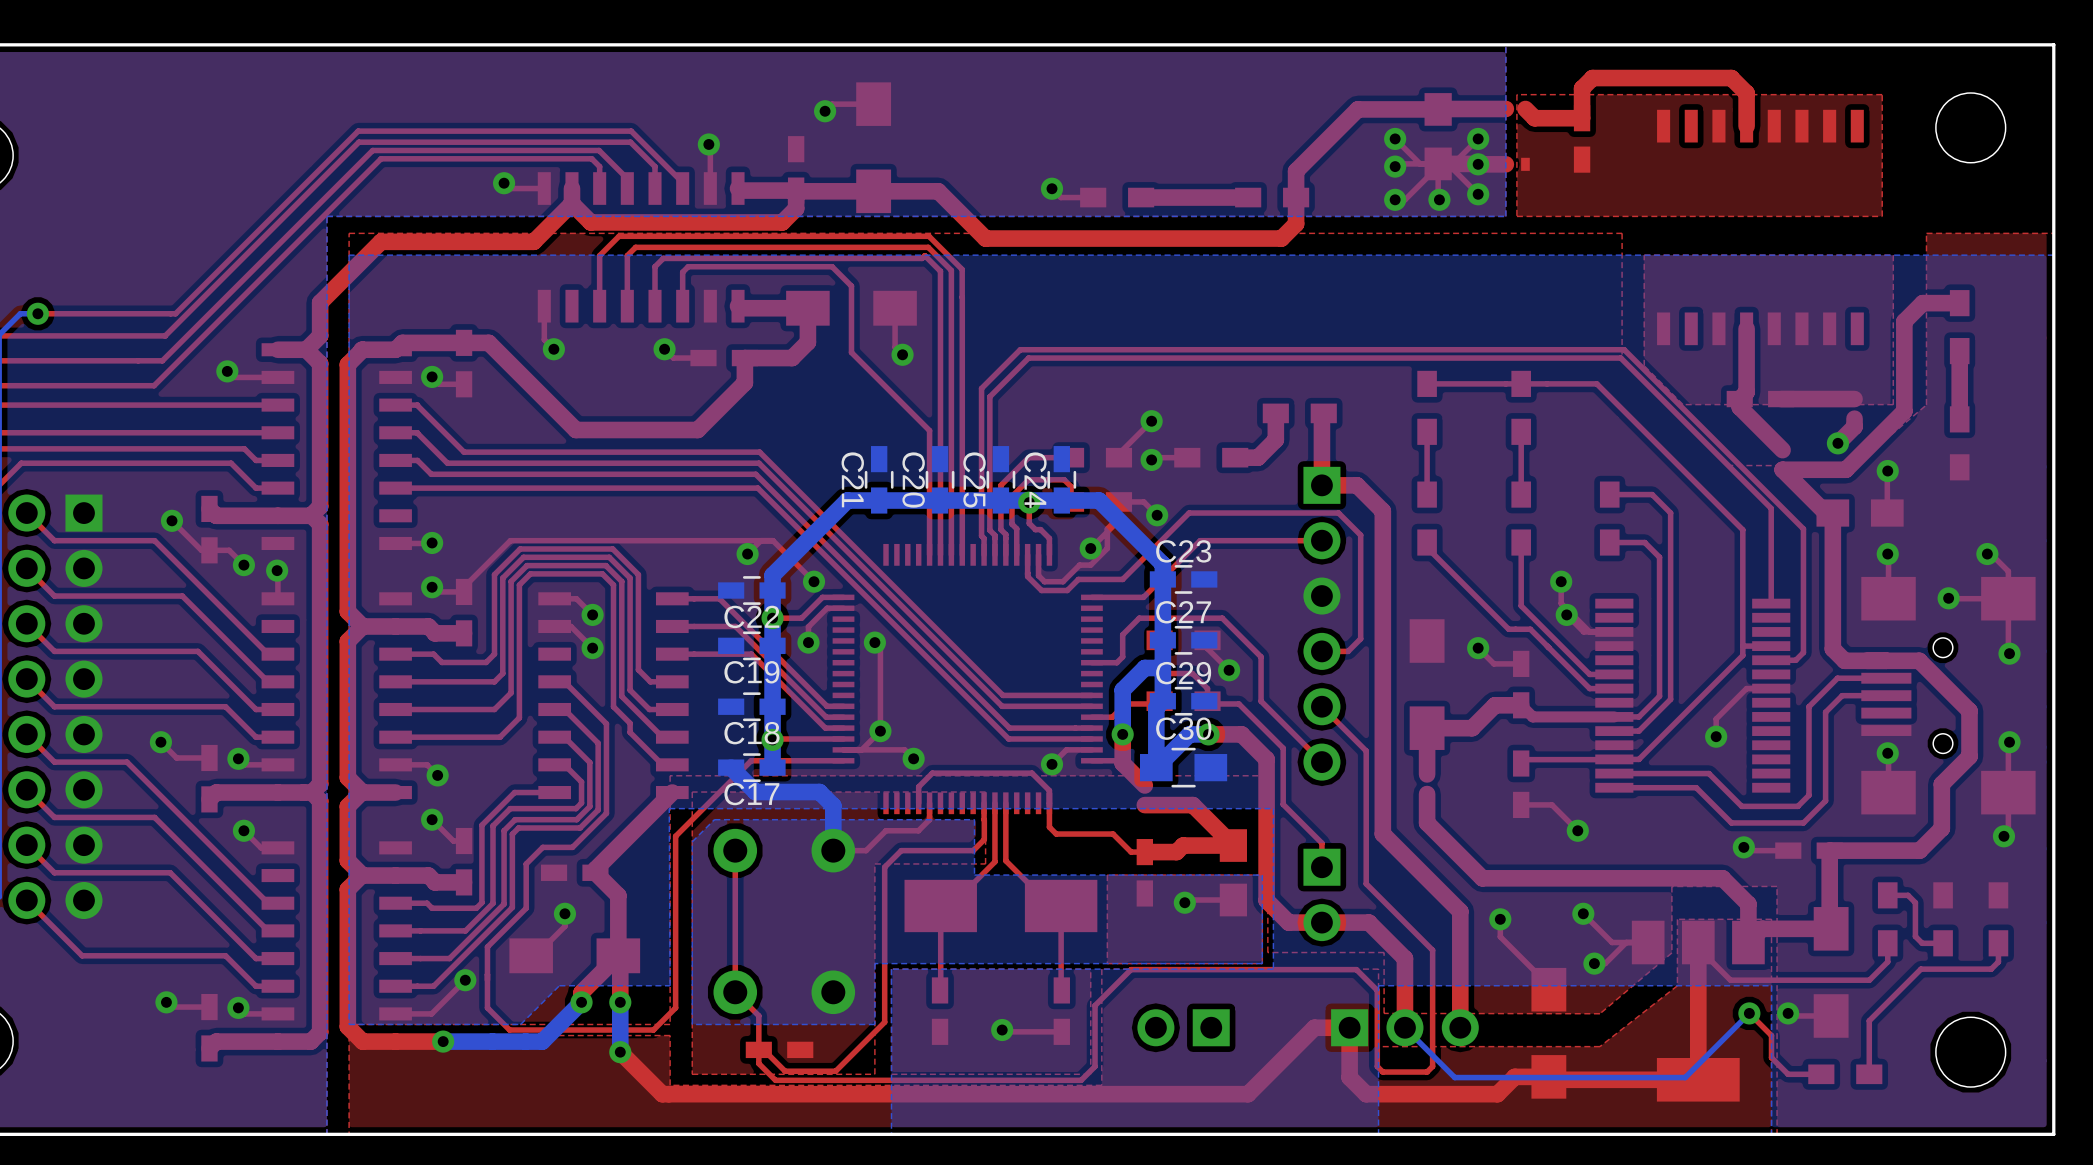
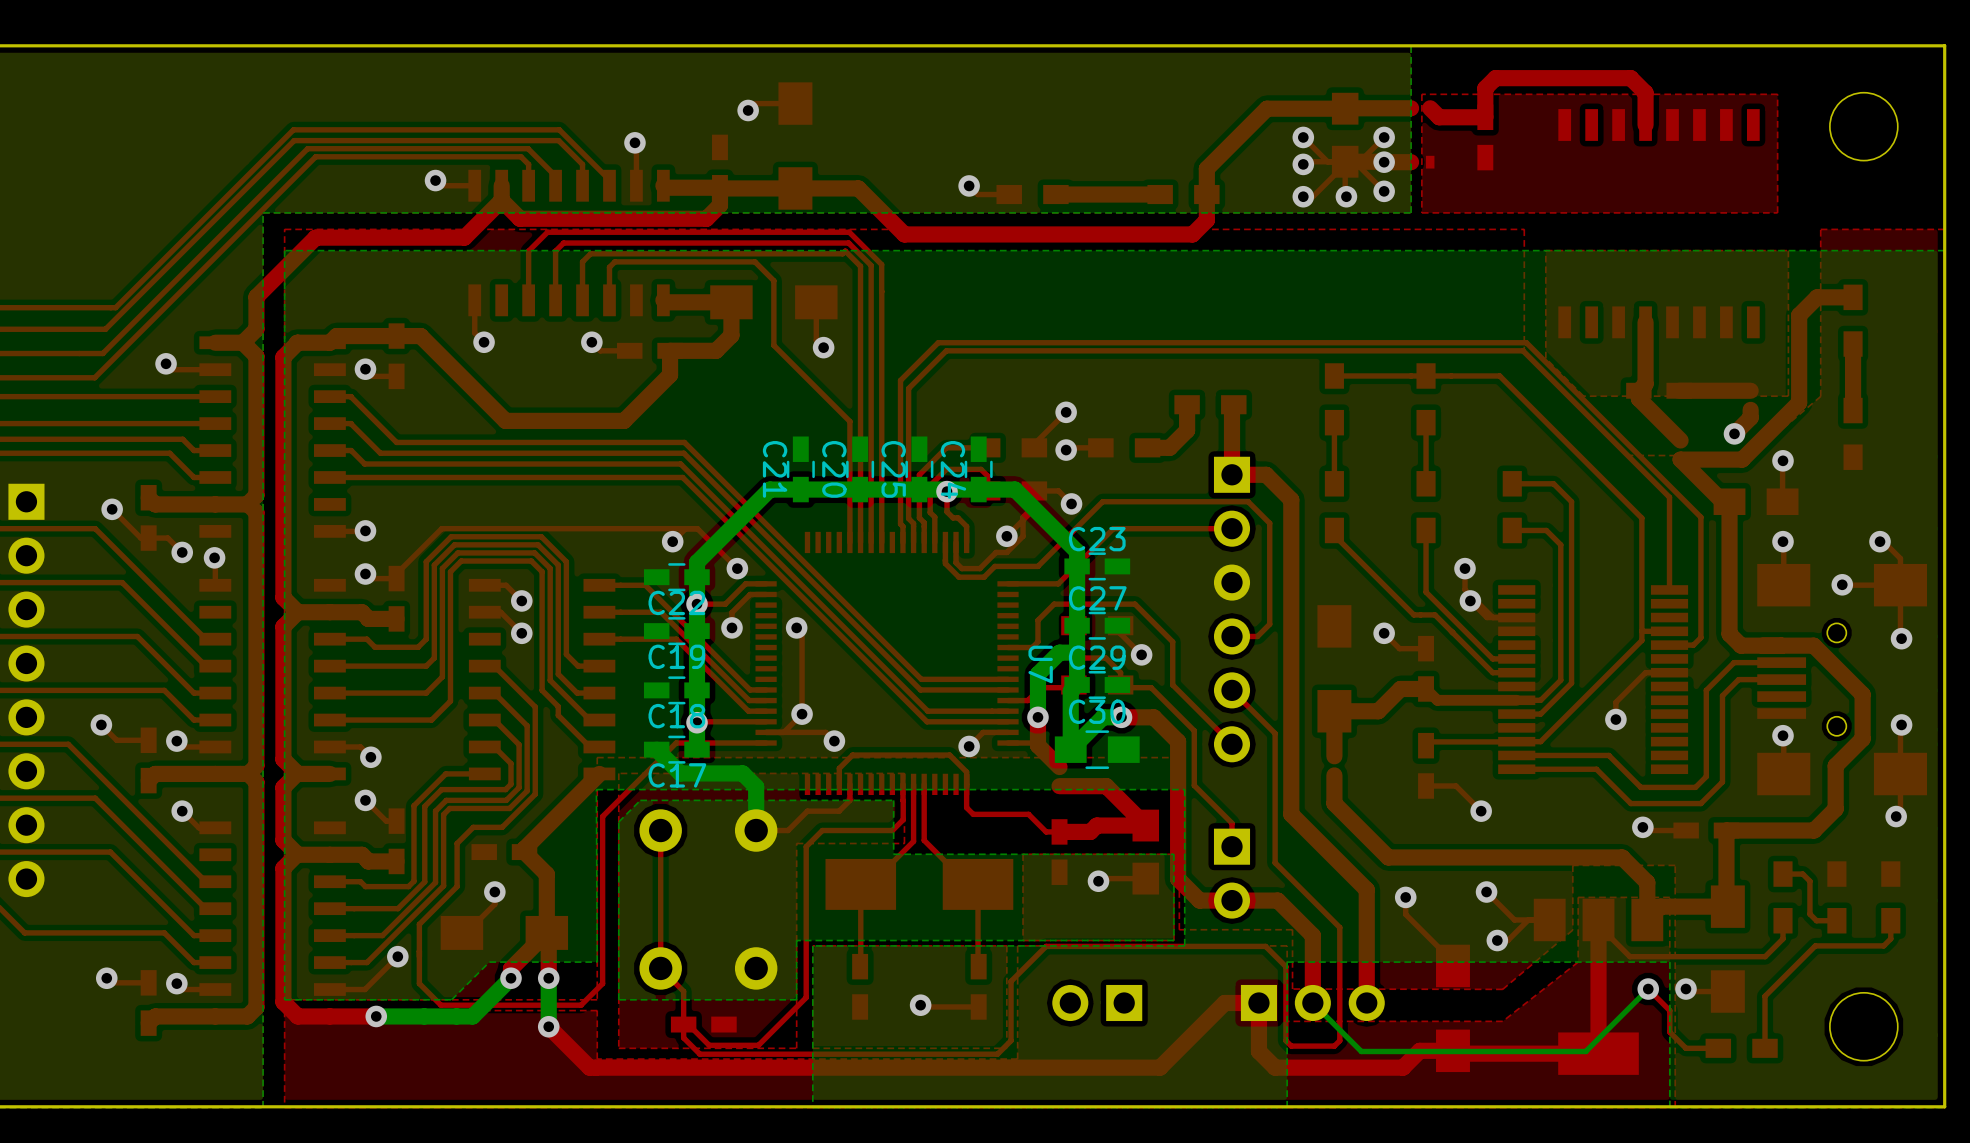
U7 name: none -> U7 (1040, 664)

